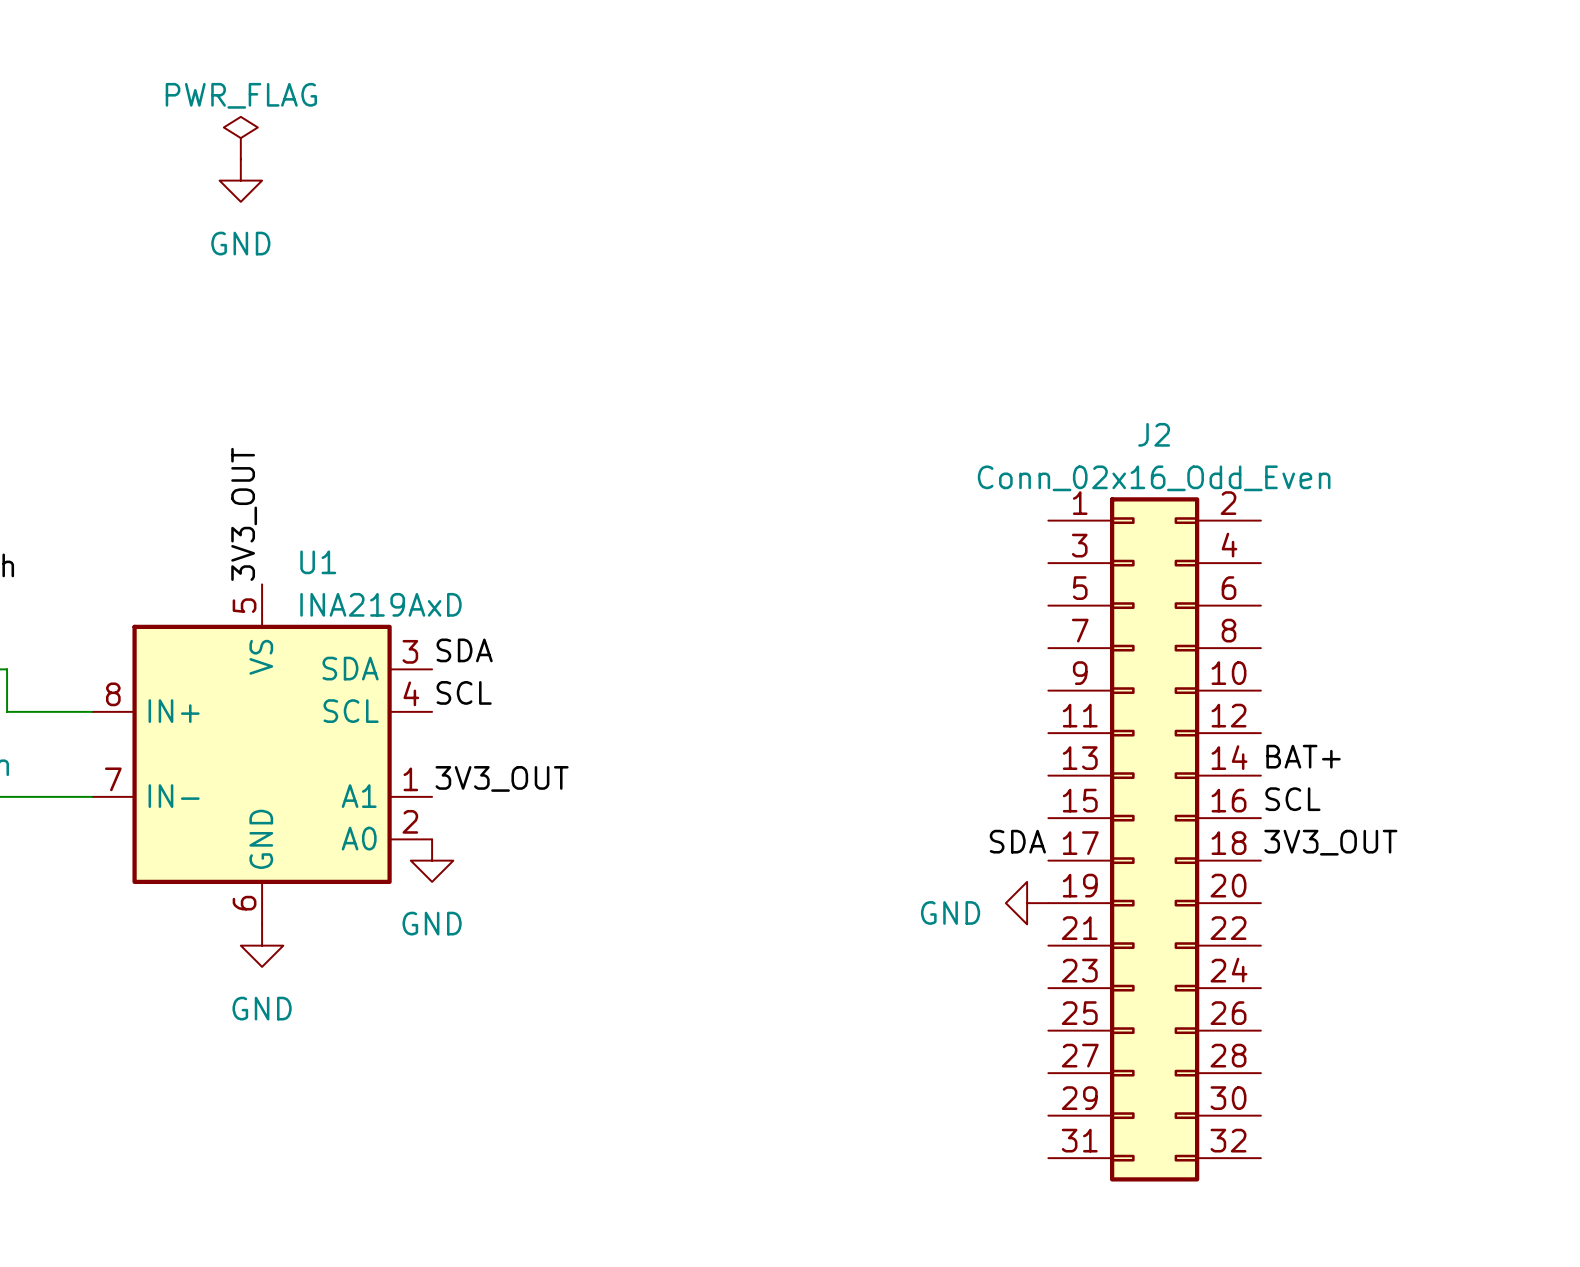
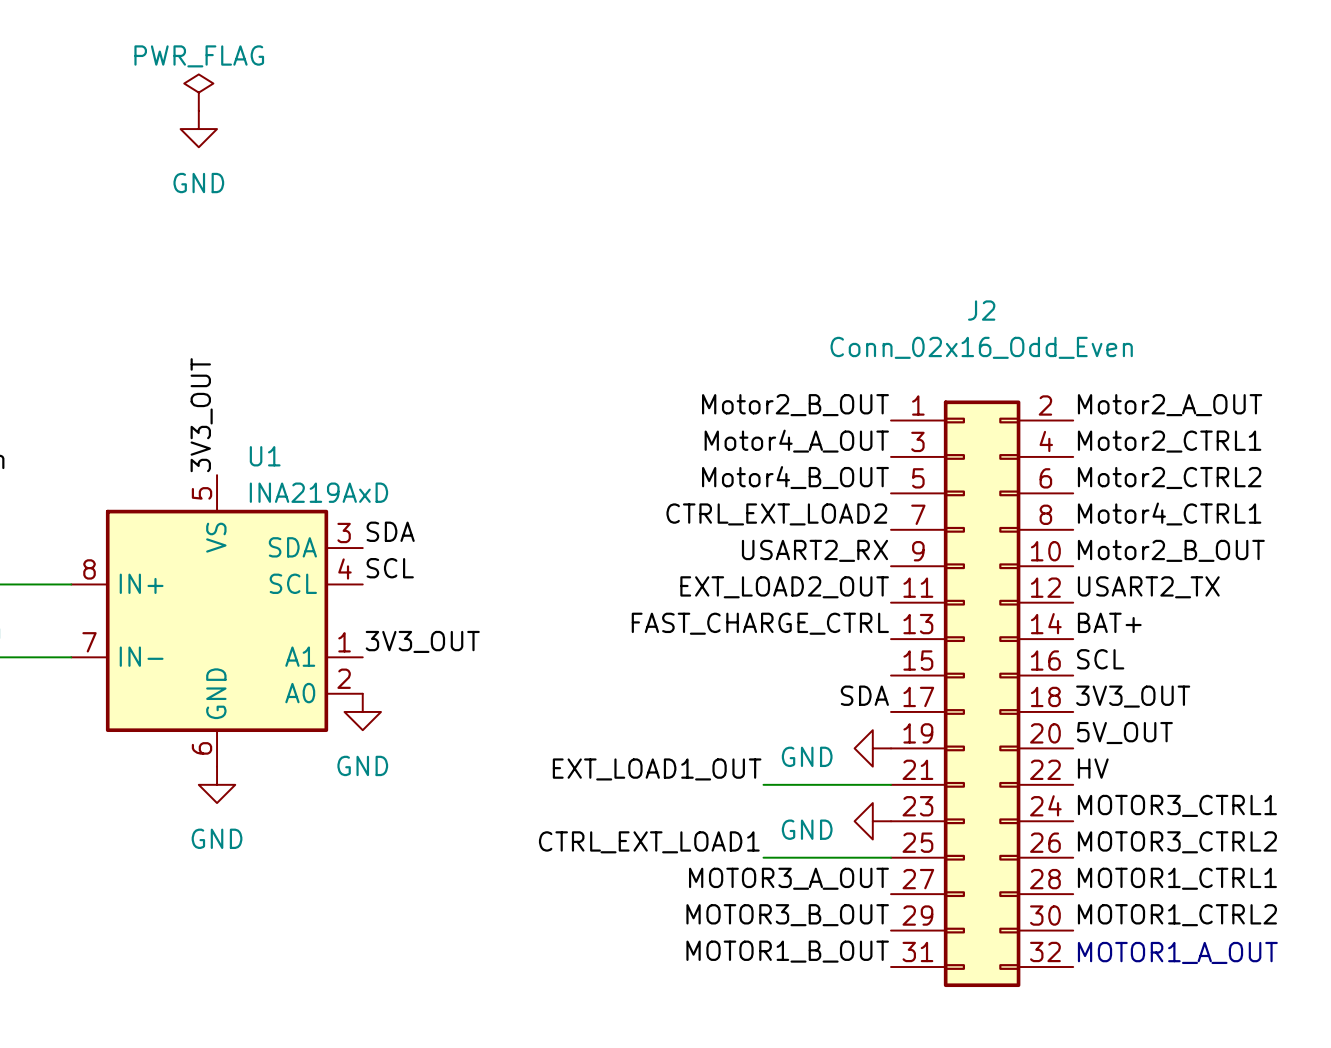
J2 name position: J2 (1154, 434) -> J2 (981, 310)
J2 value position: Conn_02x16_Odd_Even (1154, 478) -> Conn_02x16_Odd_Even (981, 347)
label: none -> Motor2_B_OUT (795, 405)
label: none -> Motor2_A_OUT (1170, 405)
label: none -> Motor4_A_OUT (796, 441)
label: none -> Motor2_CTRL1 (1169, 441)
label: none -> Motor4_B_OUT (795, 477)
label: none -> Motor2_CTRL2 (1169, 477)
label: none -> Motor4_CTRL1 (1169, 513)
label: none -> CTRL_EXT_LOAD2 (776, 514)
label: none -> USART2_RX (814, 550)
label: none -> Motor2_B_OUT (1171, 550)
label: none -> EXT_LOAD2_OUT (784, 587)
label: none -> USART2_TX (1148, 587)
label: none -> FAST_CHARGE_CTRL (760, 623)
label: none -> 5V_OUT (1124, 733)
label: none -> HV (1093, 768)
label: none -> EXT_LOAD1_OUT (657, 769)
wire: none -> (763, 784) (891, 784)
label: none -> MOTOR3_CTRL1 (1177, 805)
power symbol: none -> GND (872, 821)
label: none -> CTRL_EXT_LOAD1 (649, 842)
label: none -> MOTOR3_CTRL2 (1177, 842)
wire: none -> (763, 857) (891, 857)
label: none -> MOTOR3_A_OUT (788, 878)
label: none -> MOTOR1_CTRL1 (1177, 878)
label: none -> MOTOR3_B_OUT (787, 915)
label: none -> MOTOR1_CTRL2 (1177, 915)
label: none -> MOTOR1_B_OUT (787, 951)
text: none -> MOTOR1_A_OUT (1177, 952)

